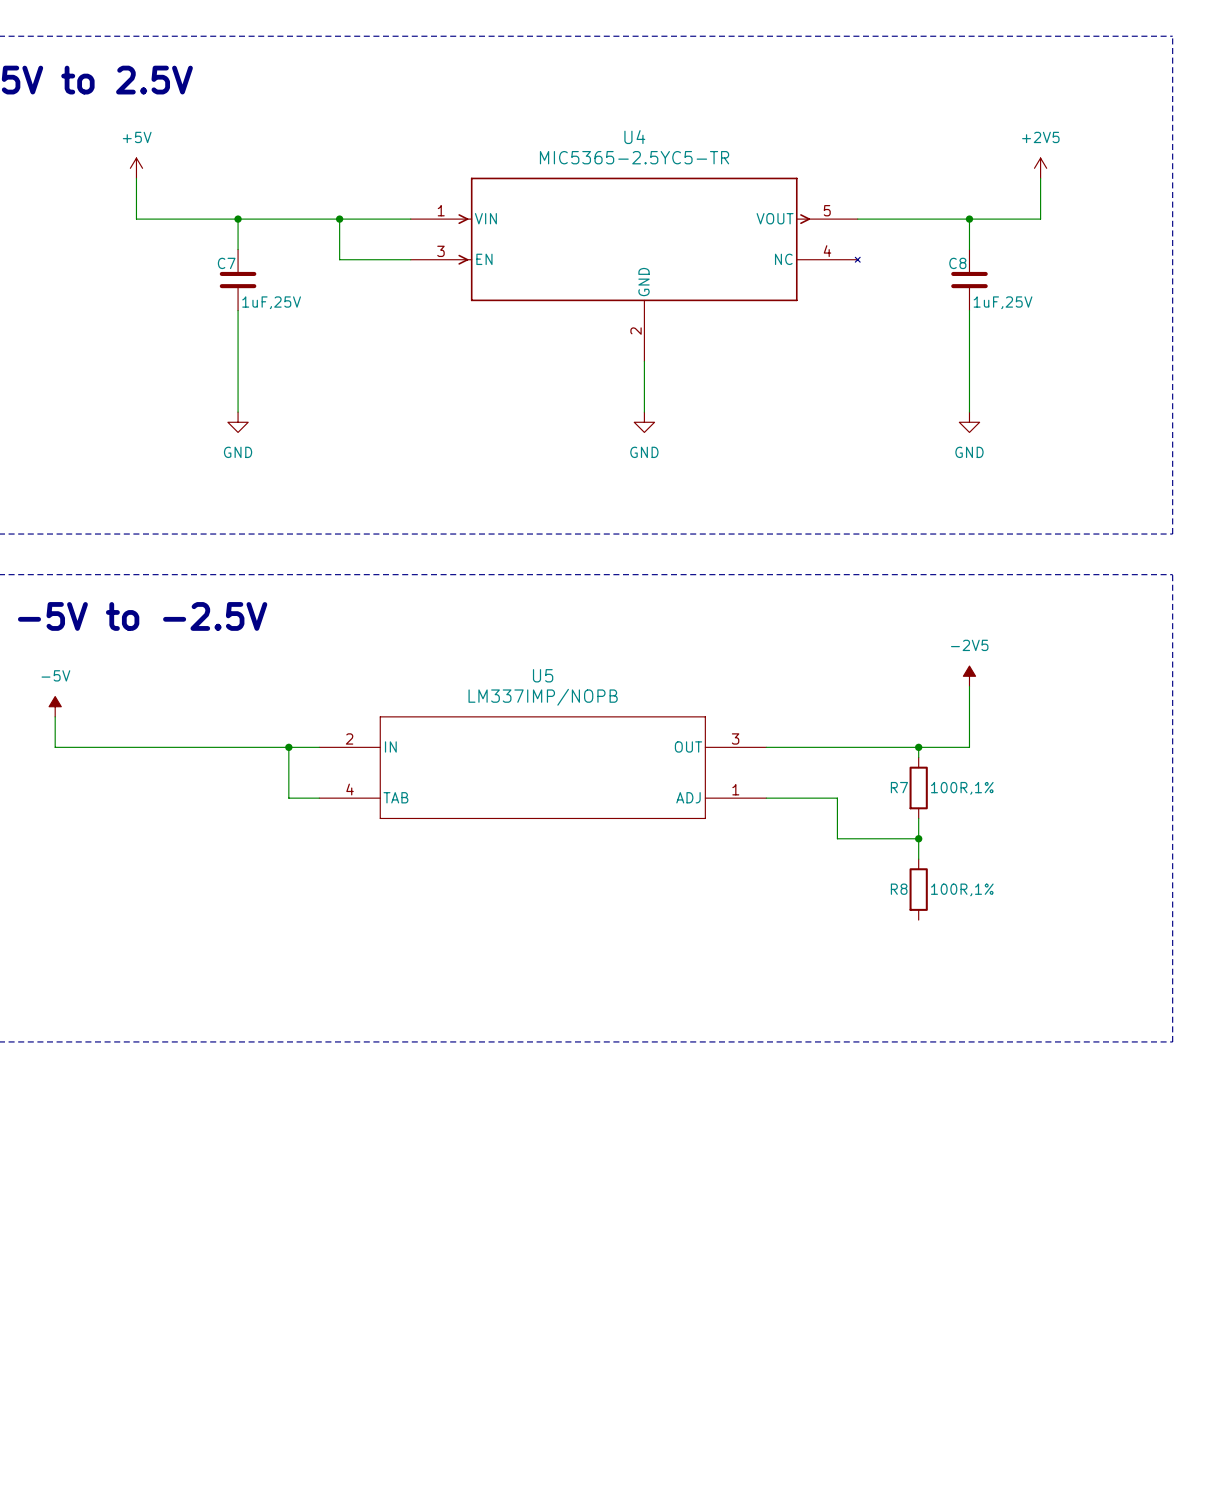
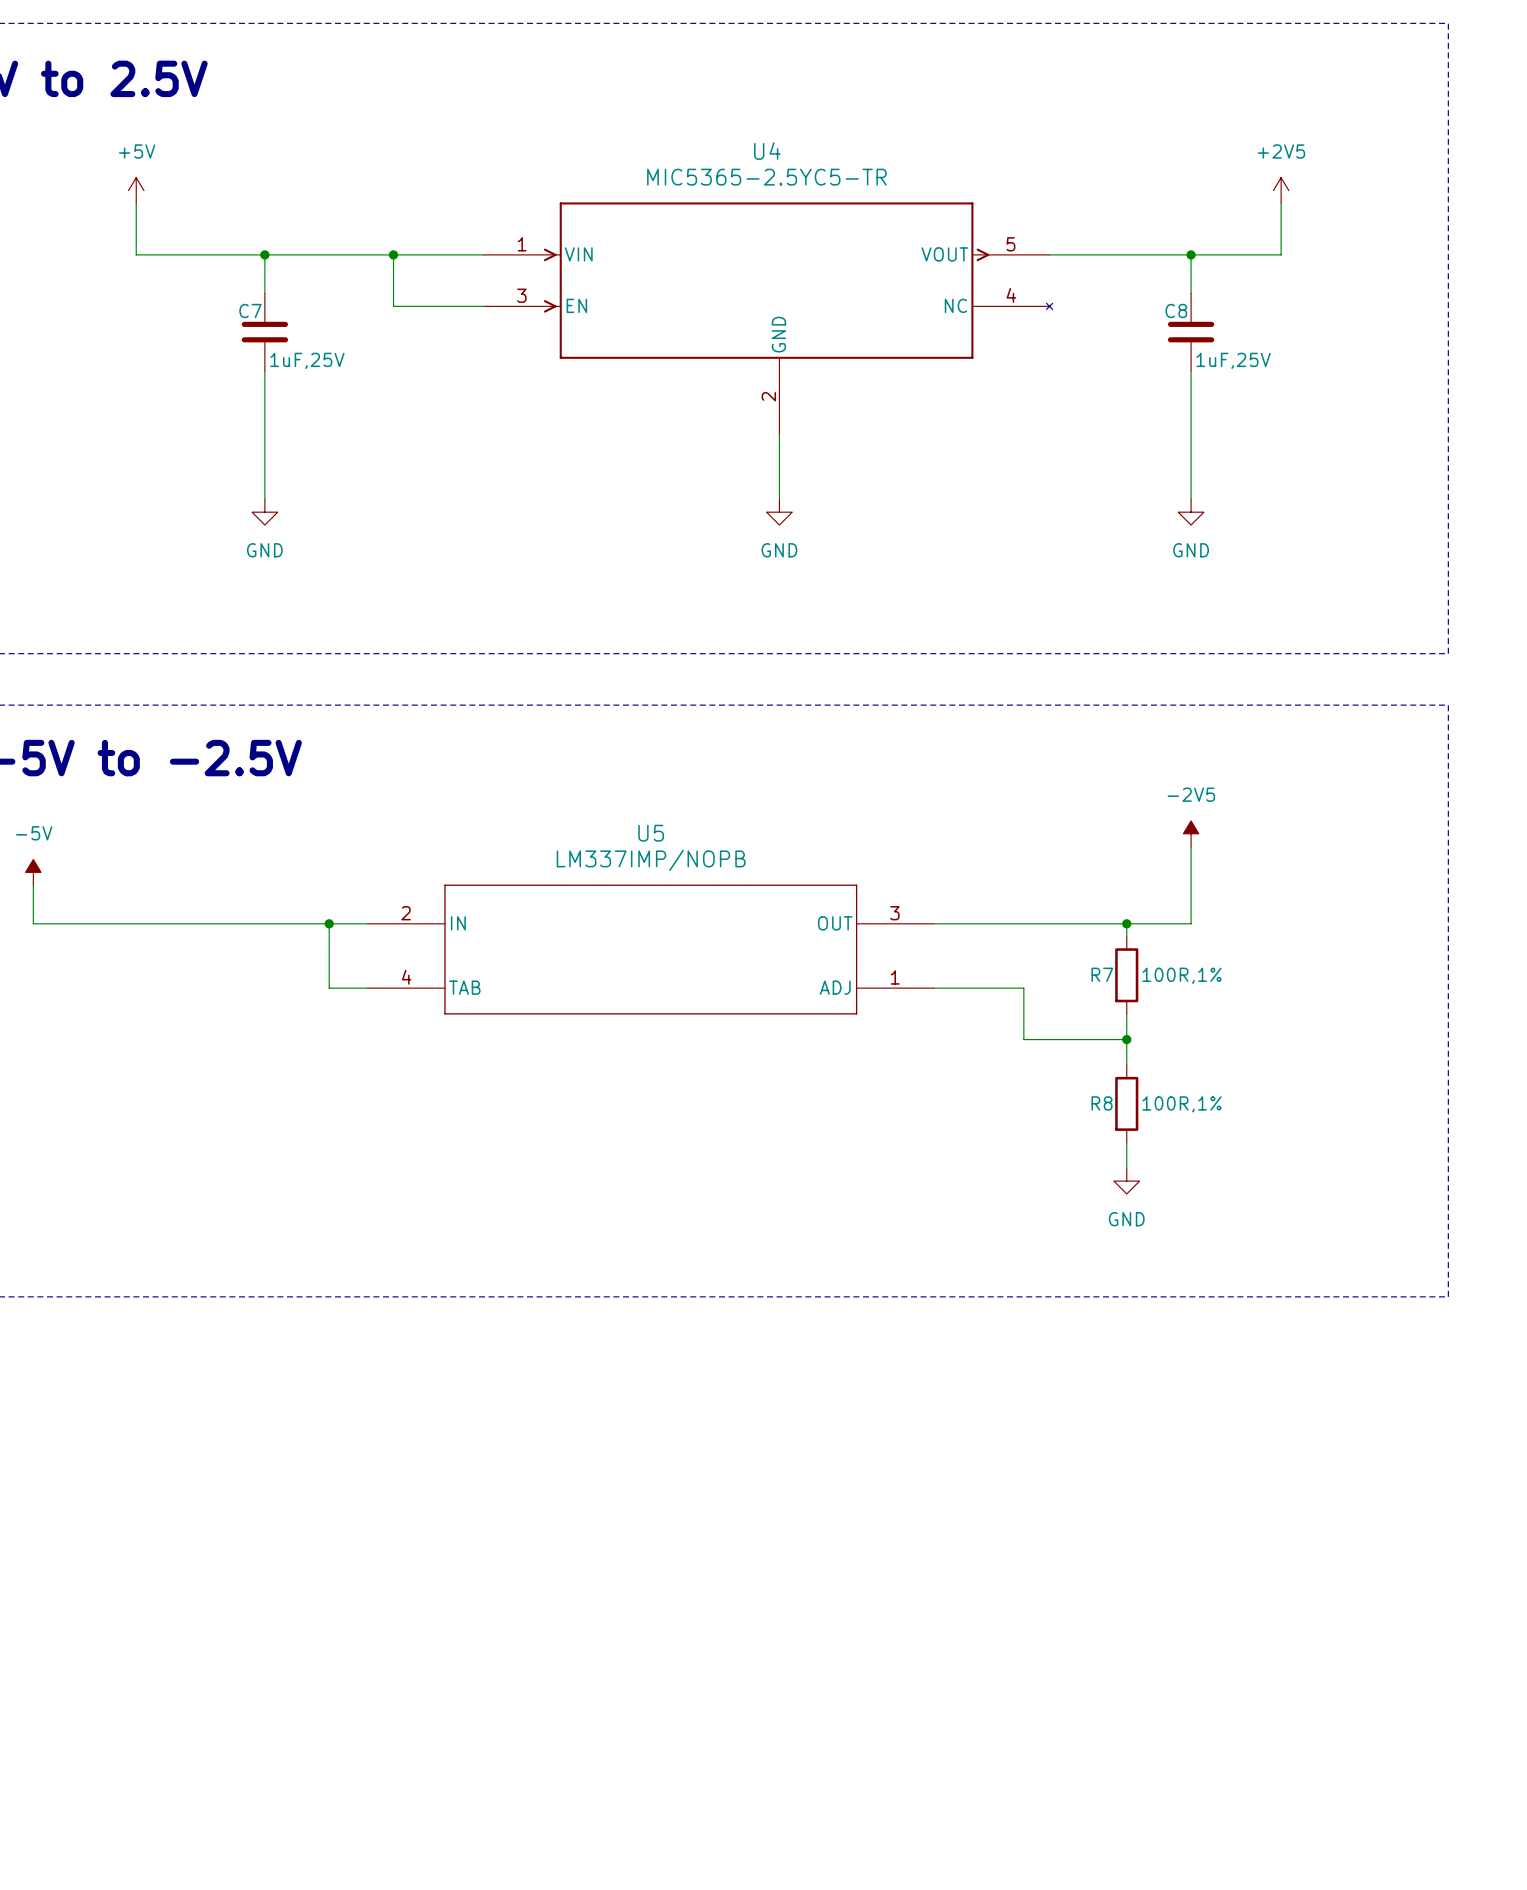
wire: none -> (1126, 1142) (1126, 1168)
power symbol: none -> GND (1126, 1181)

